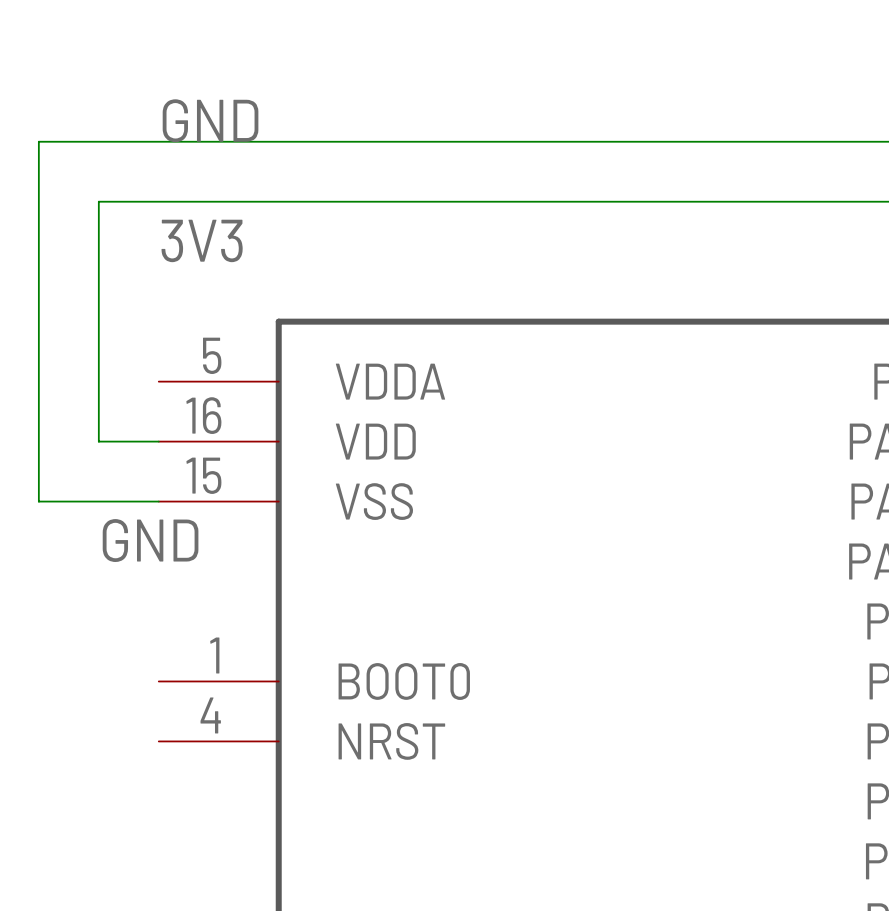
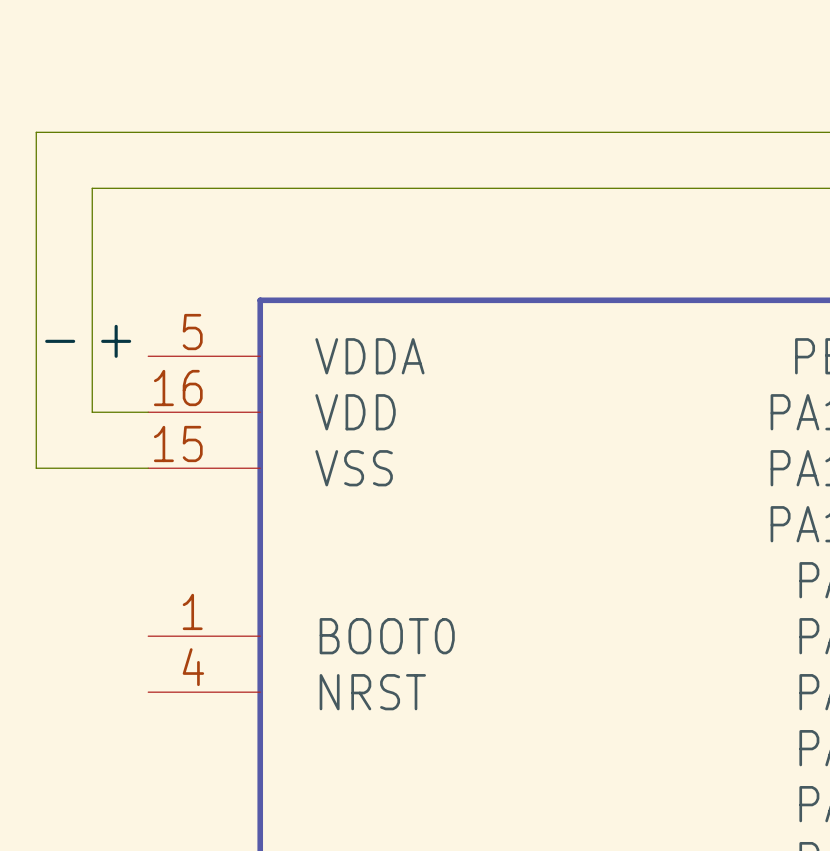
label: GND (210, 120) -> none
label: 3V3 (202, 240) -> none
label: none -> - (60, 341)
label: none -> + (116, 341)
label: GND (150, 540) -> none

